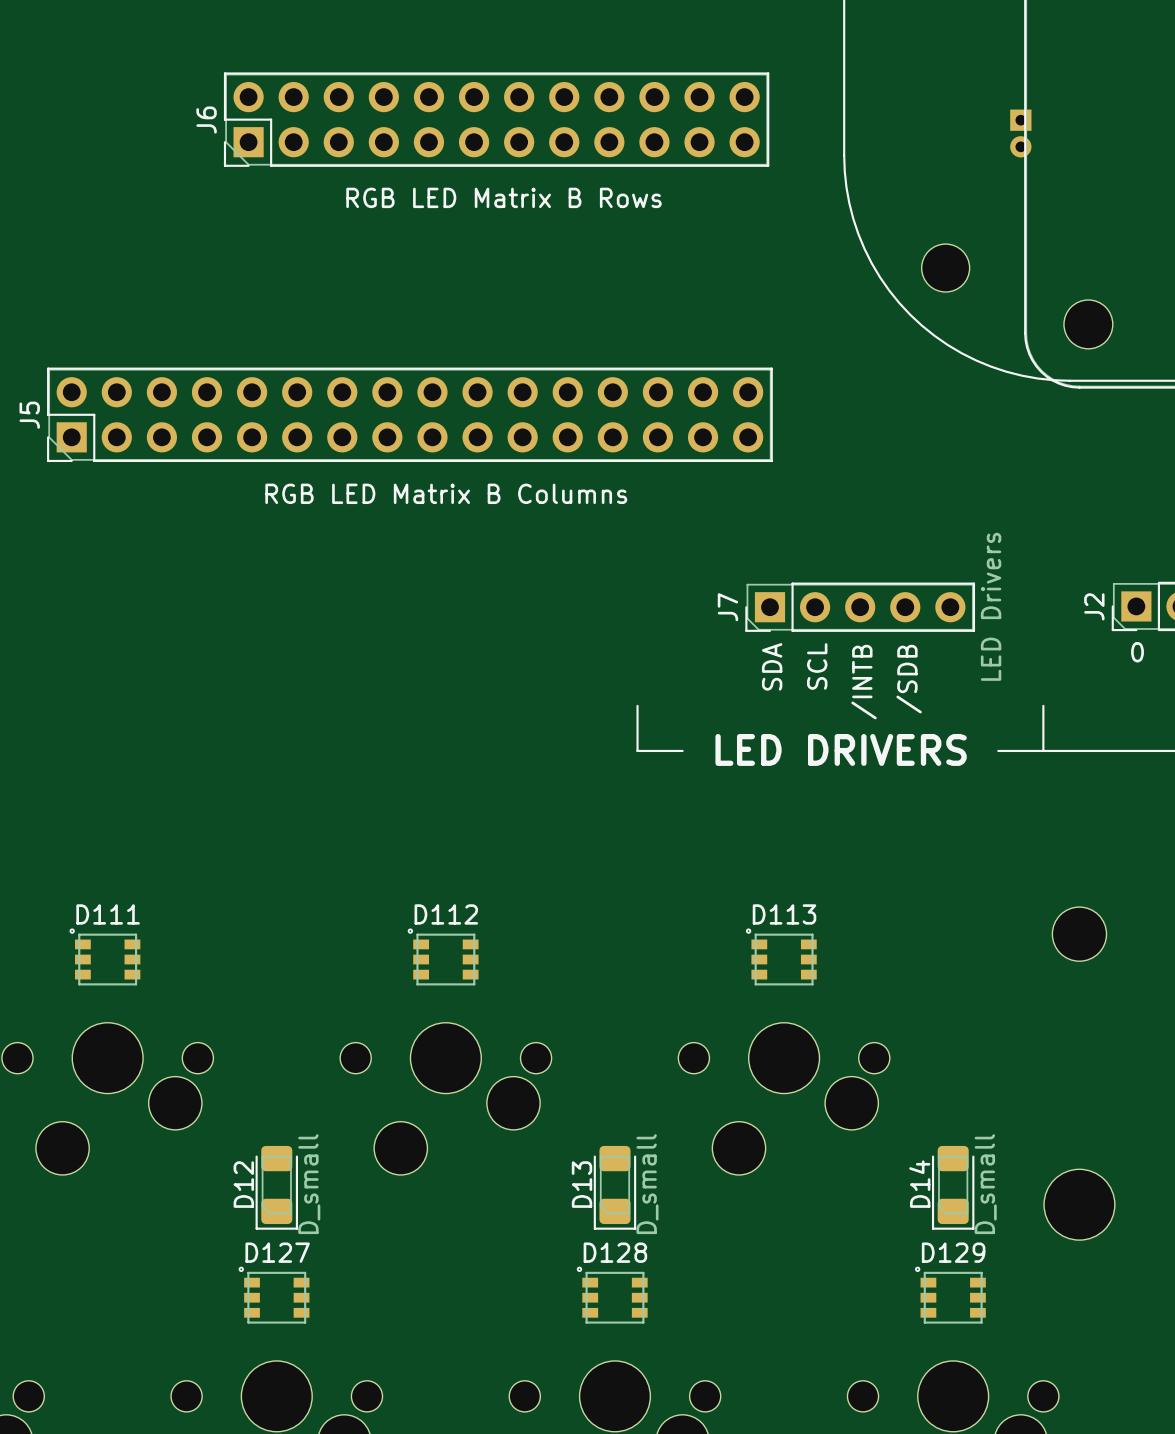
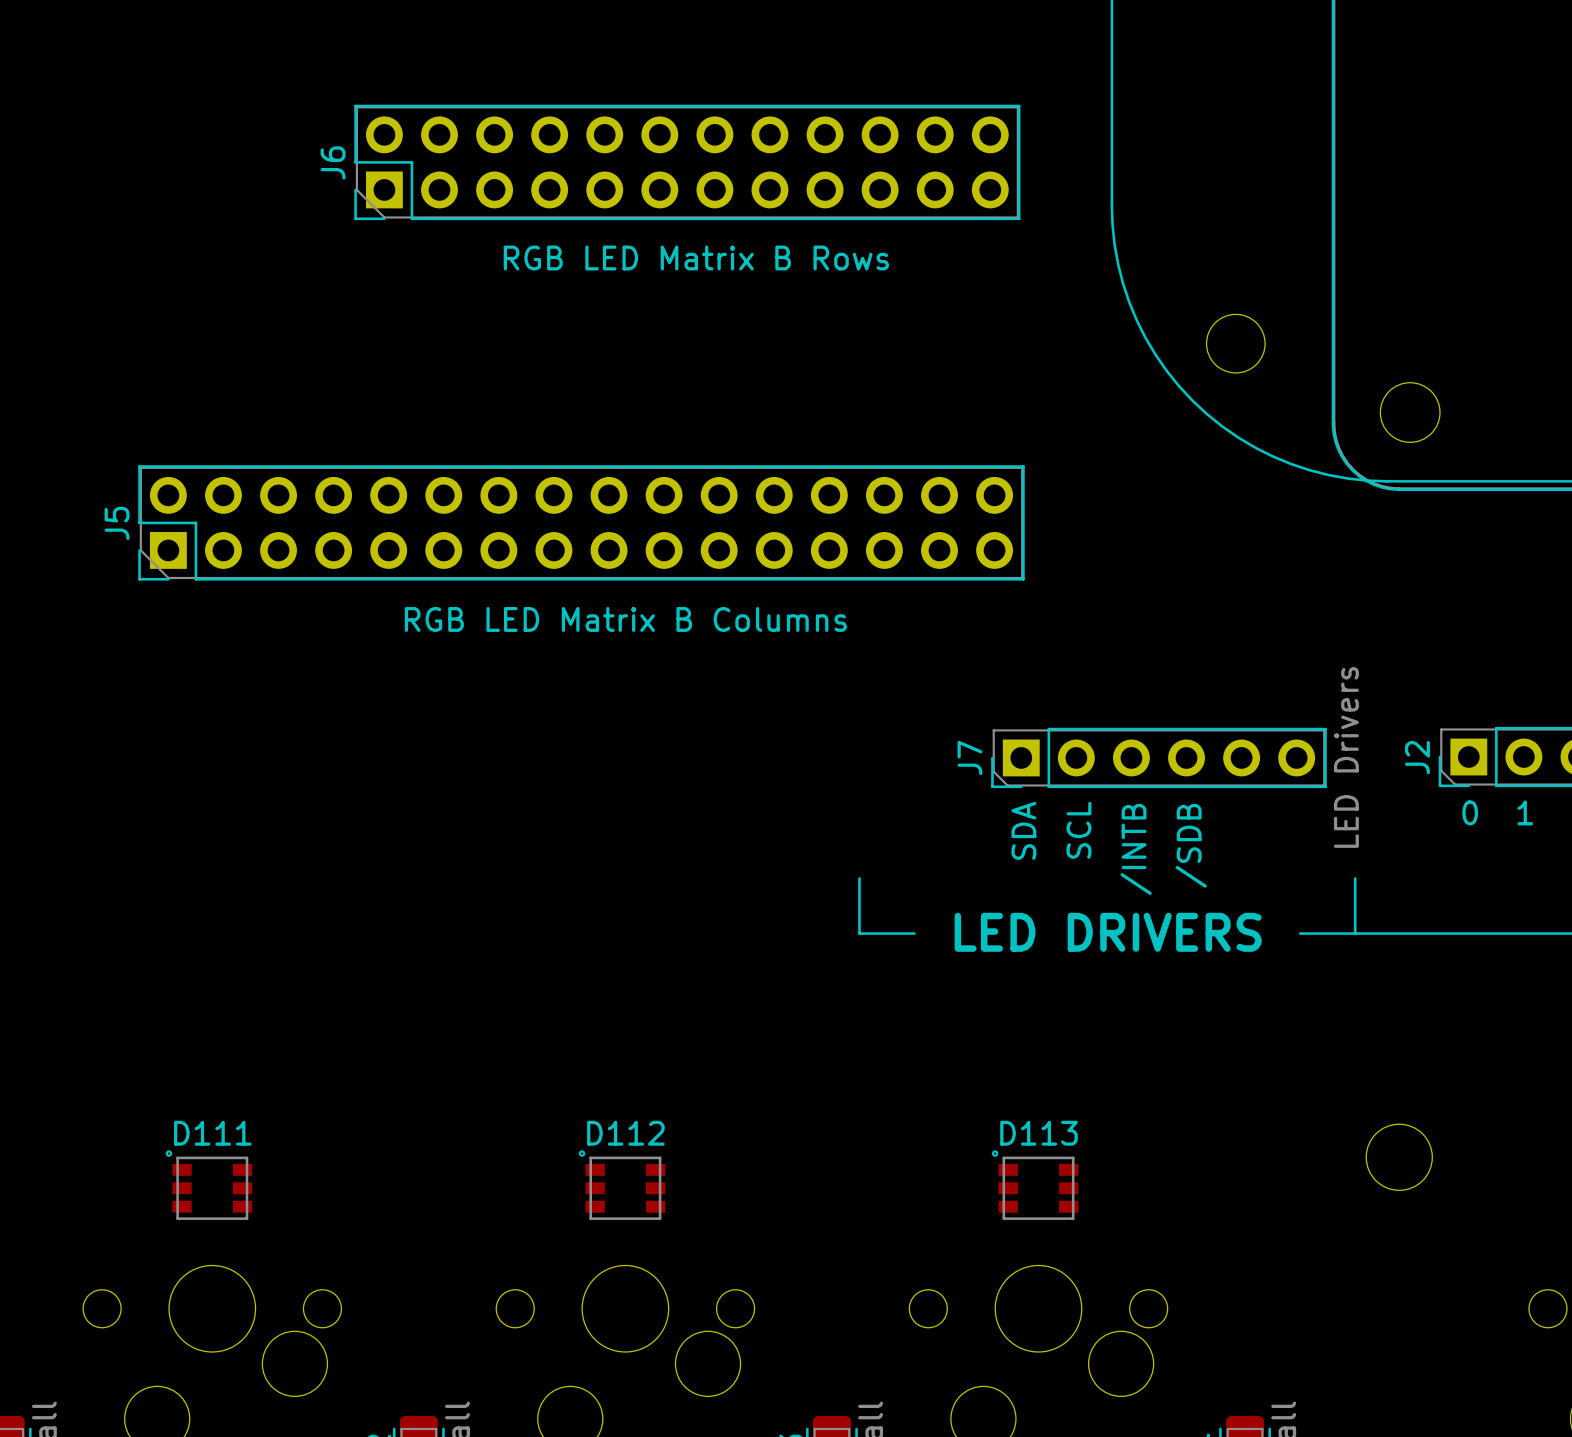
part: (1020, 133) -> none
J7 footprint: [745, 582, 976, 632] -> [991, 727, 1327, 789]

